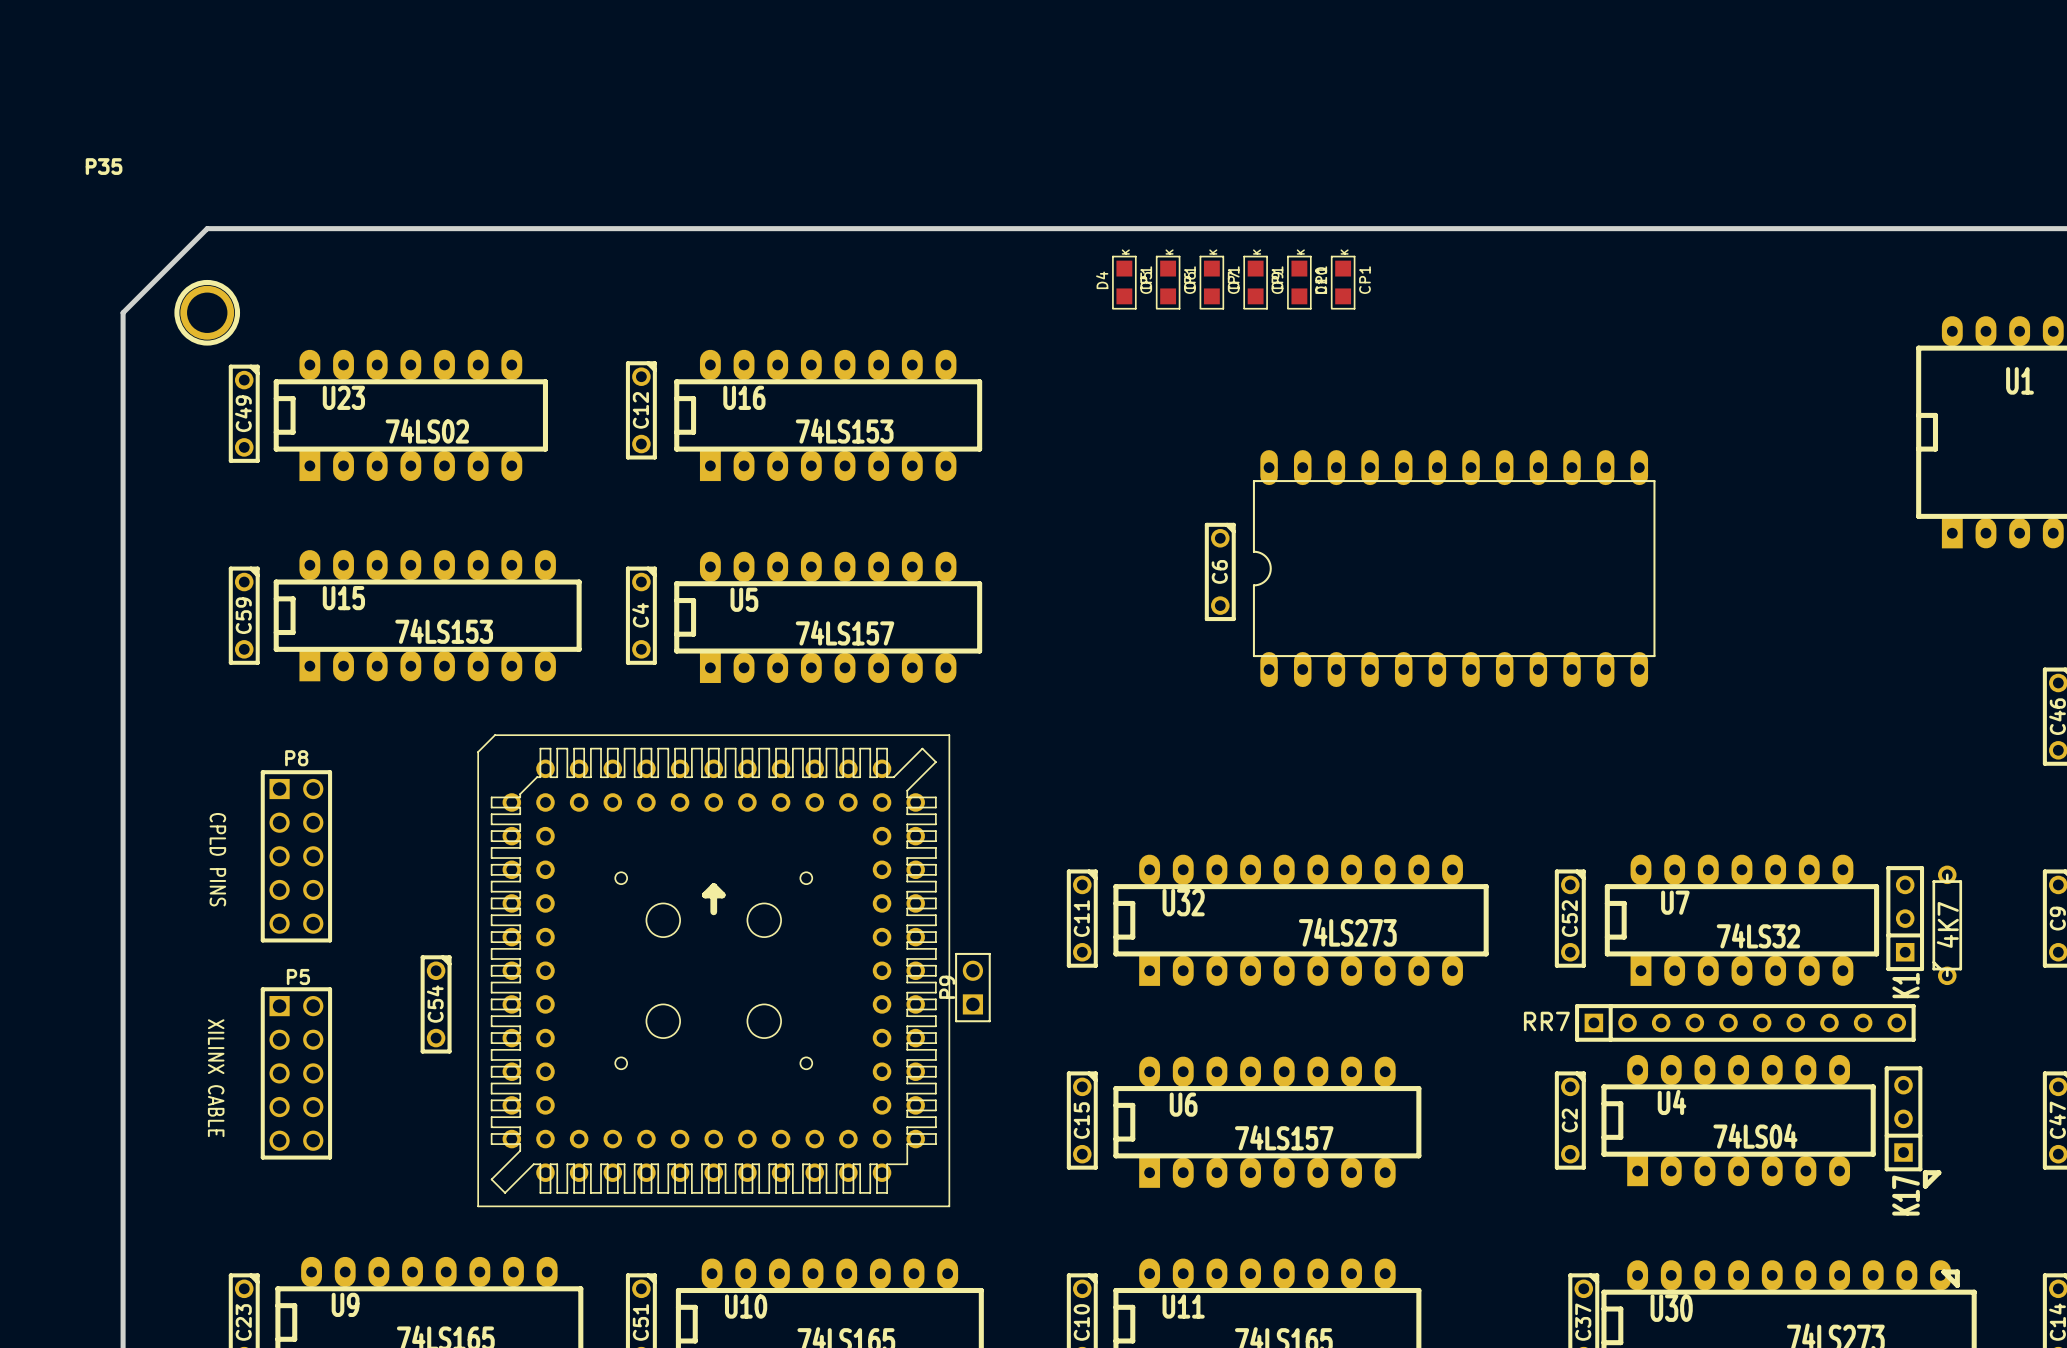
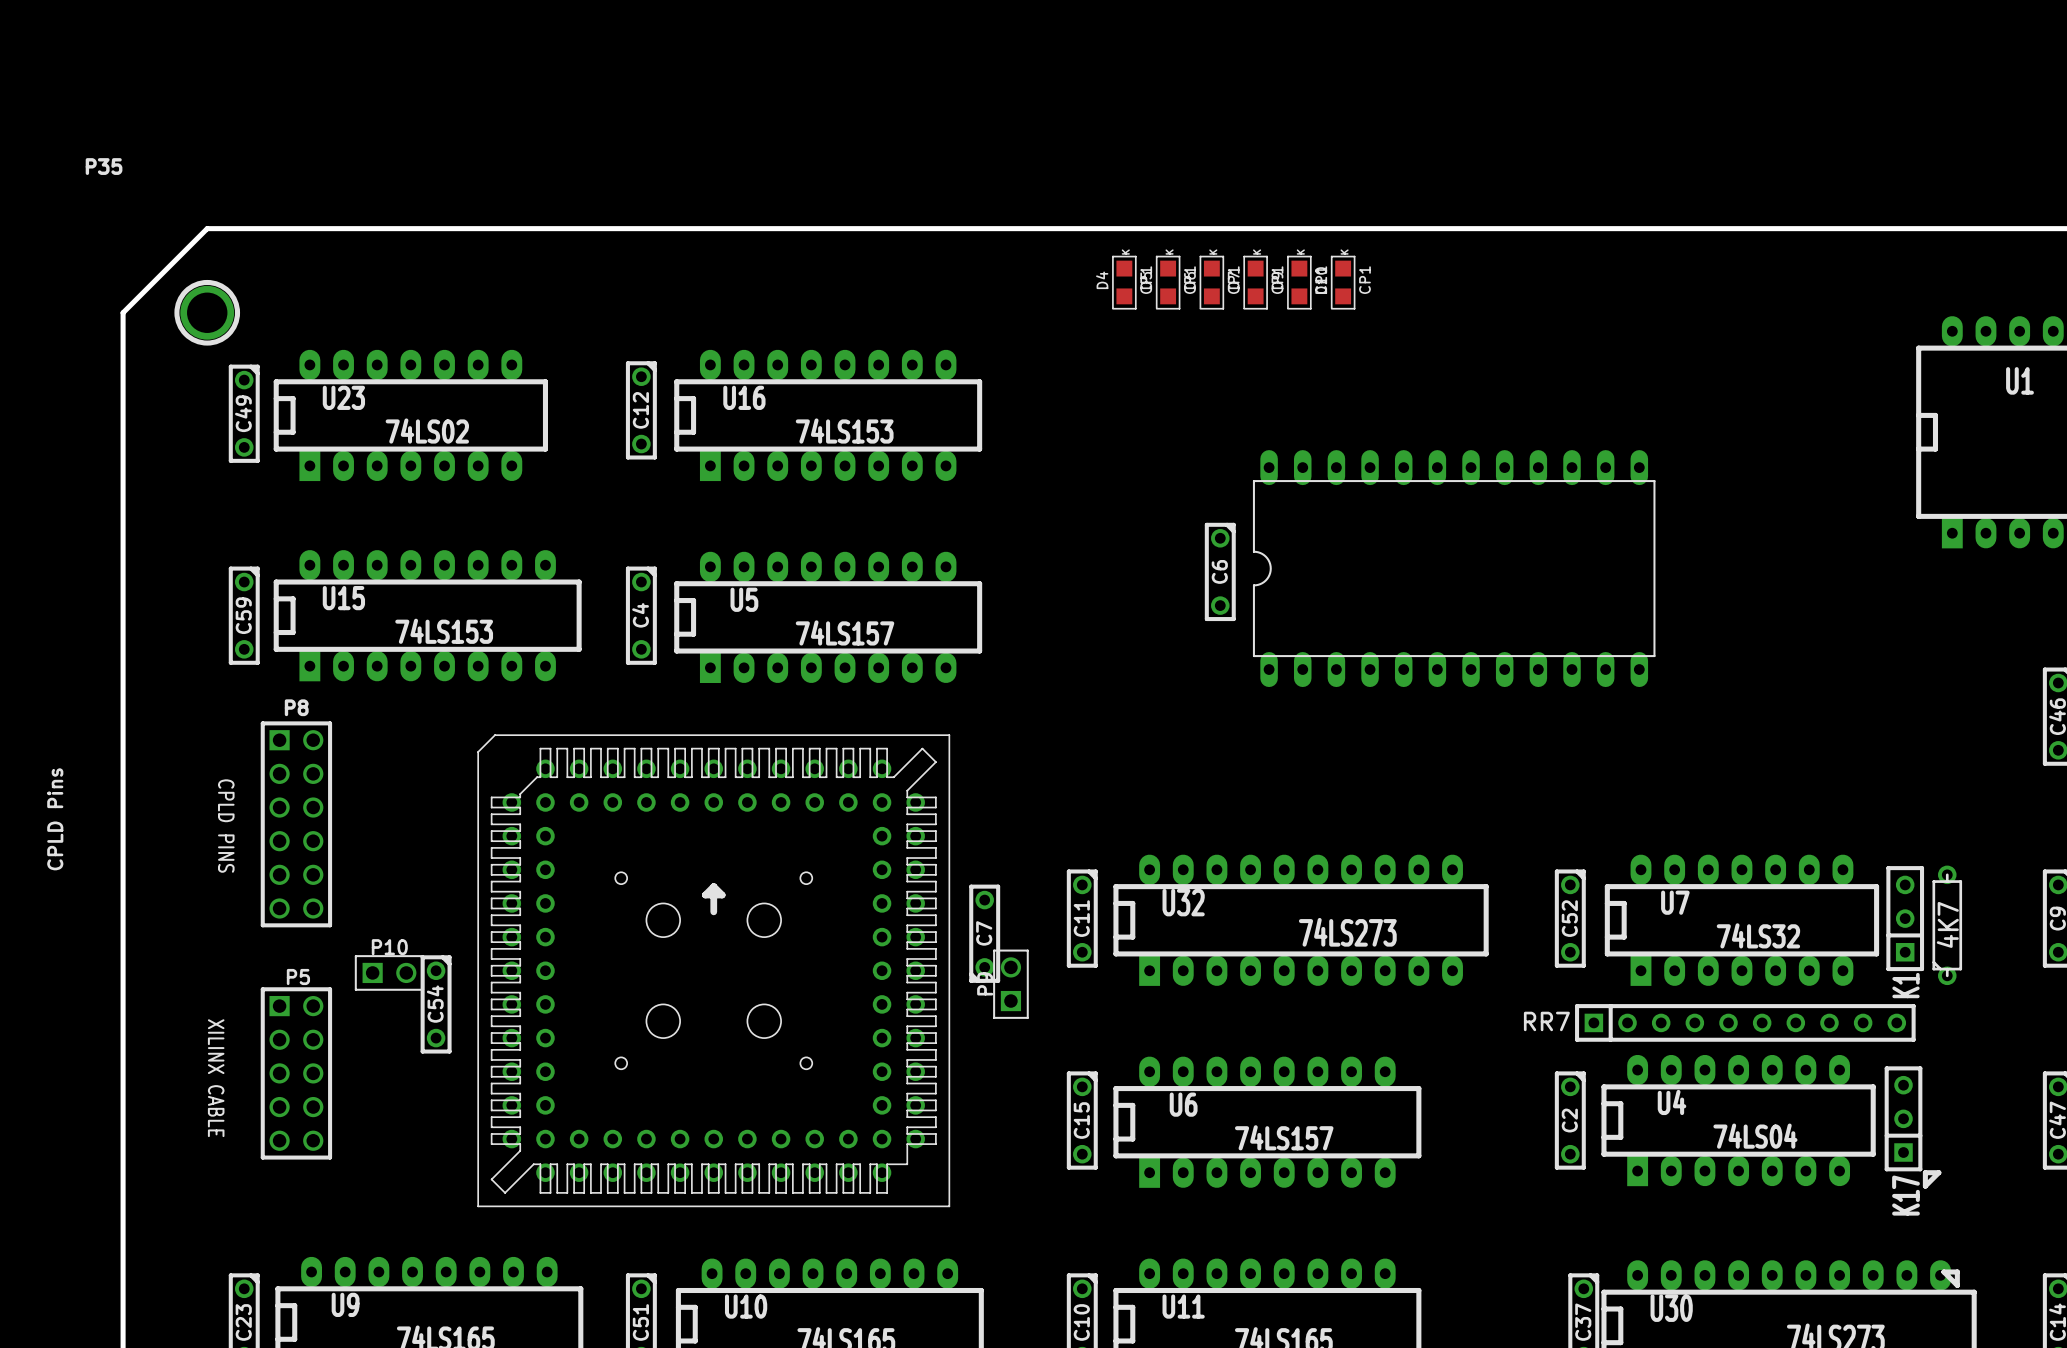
P8 footprint: [260, 770, 333, 943] -> [260, 721, 333, 928]
P8 value: none -> CPLD Pins (55, 819)
text position: CPLD PINS (217, 859) -> CPLD PINS (226, 826)
C7: none -> (984, 933)
P10: none -> (389, 972)
P9 position: (972, 987) -> (1010, 984)

